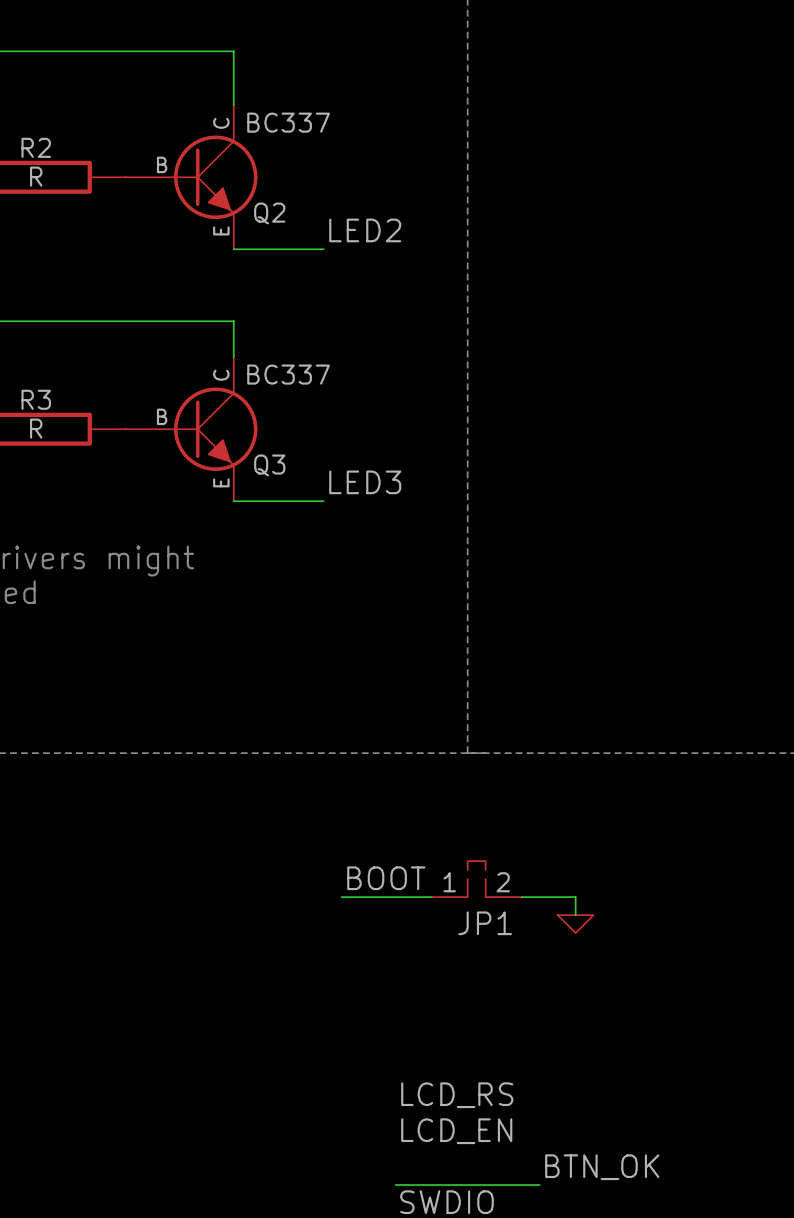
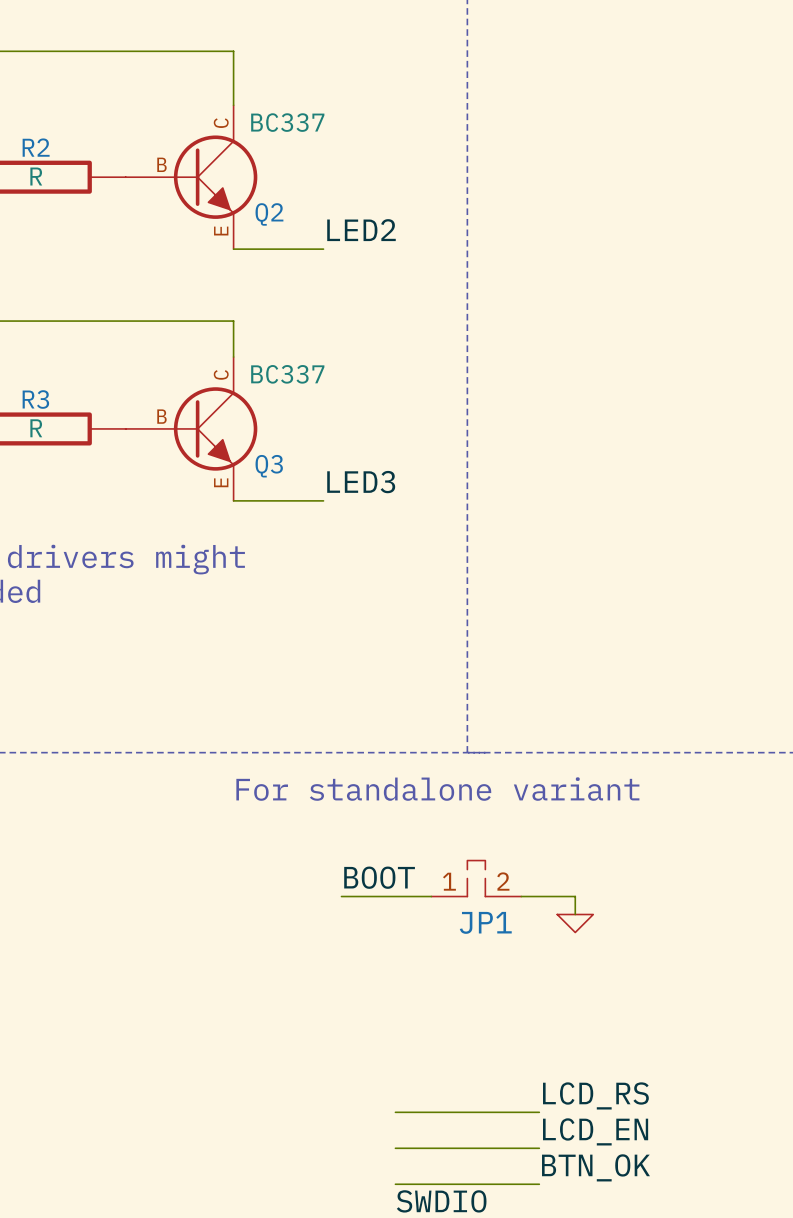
text: none -> For standalone variant (437, 789)
label position: LCD_RS (457, 1095) -> LCD_RS (595, 1095)
wire: none -> (395, 1112) (539, 1112)
label position: LCD_EN (456, 1131) -> LCD_EN (595, 1131)
wire: none -> (395, 1148) (539, 1148)

